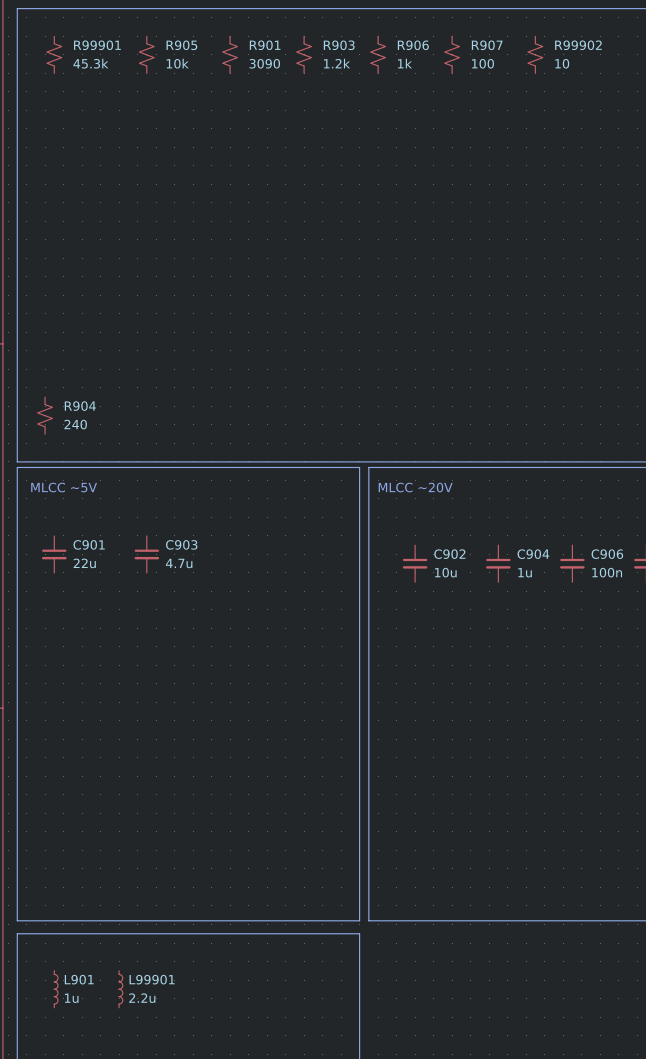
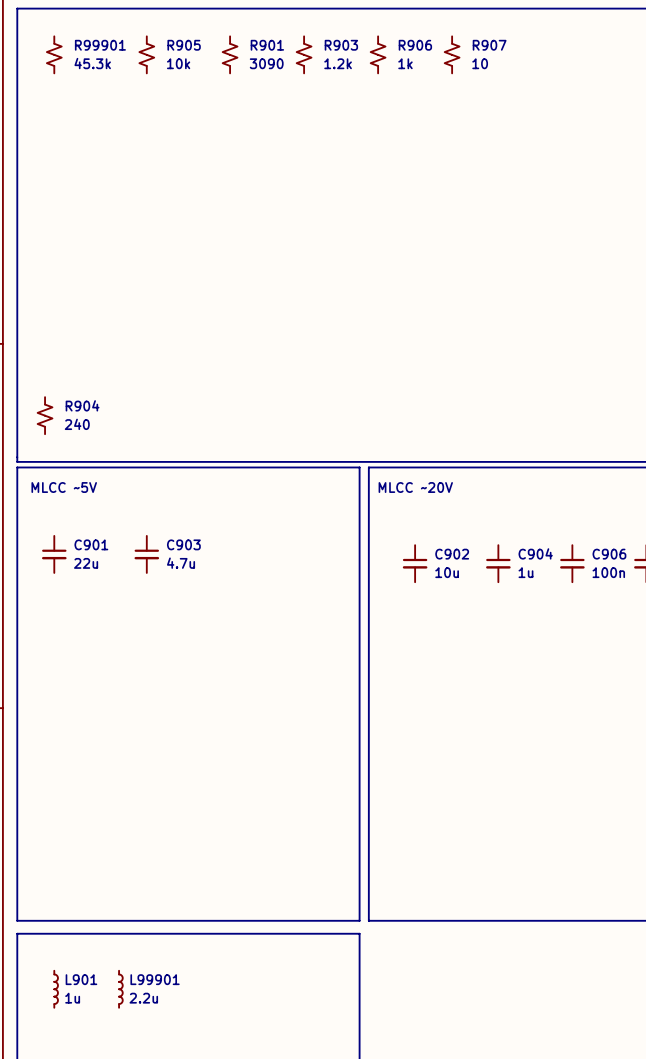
R99902: 10 (535, 54) -> none
R907 value: 100 (483, 63) -> 10 (480, 63)

